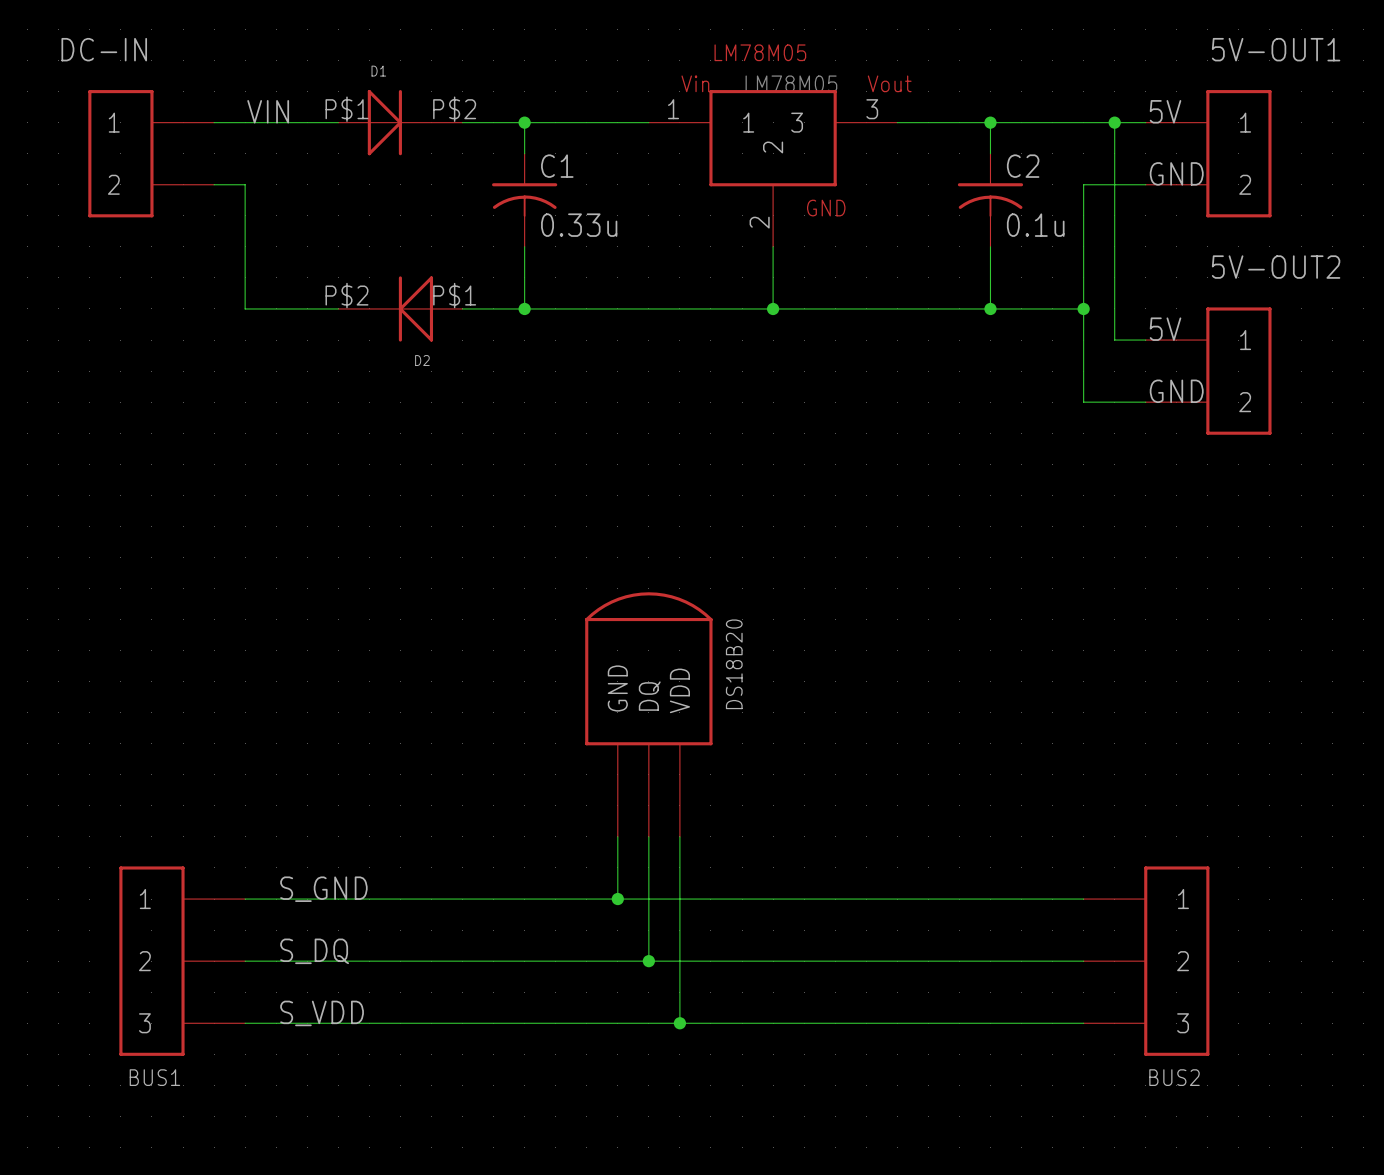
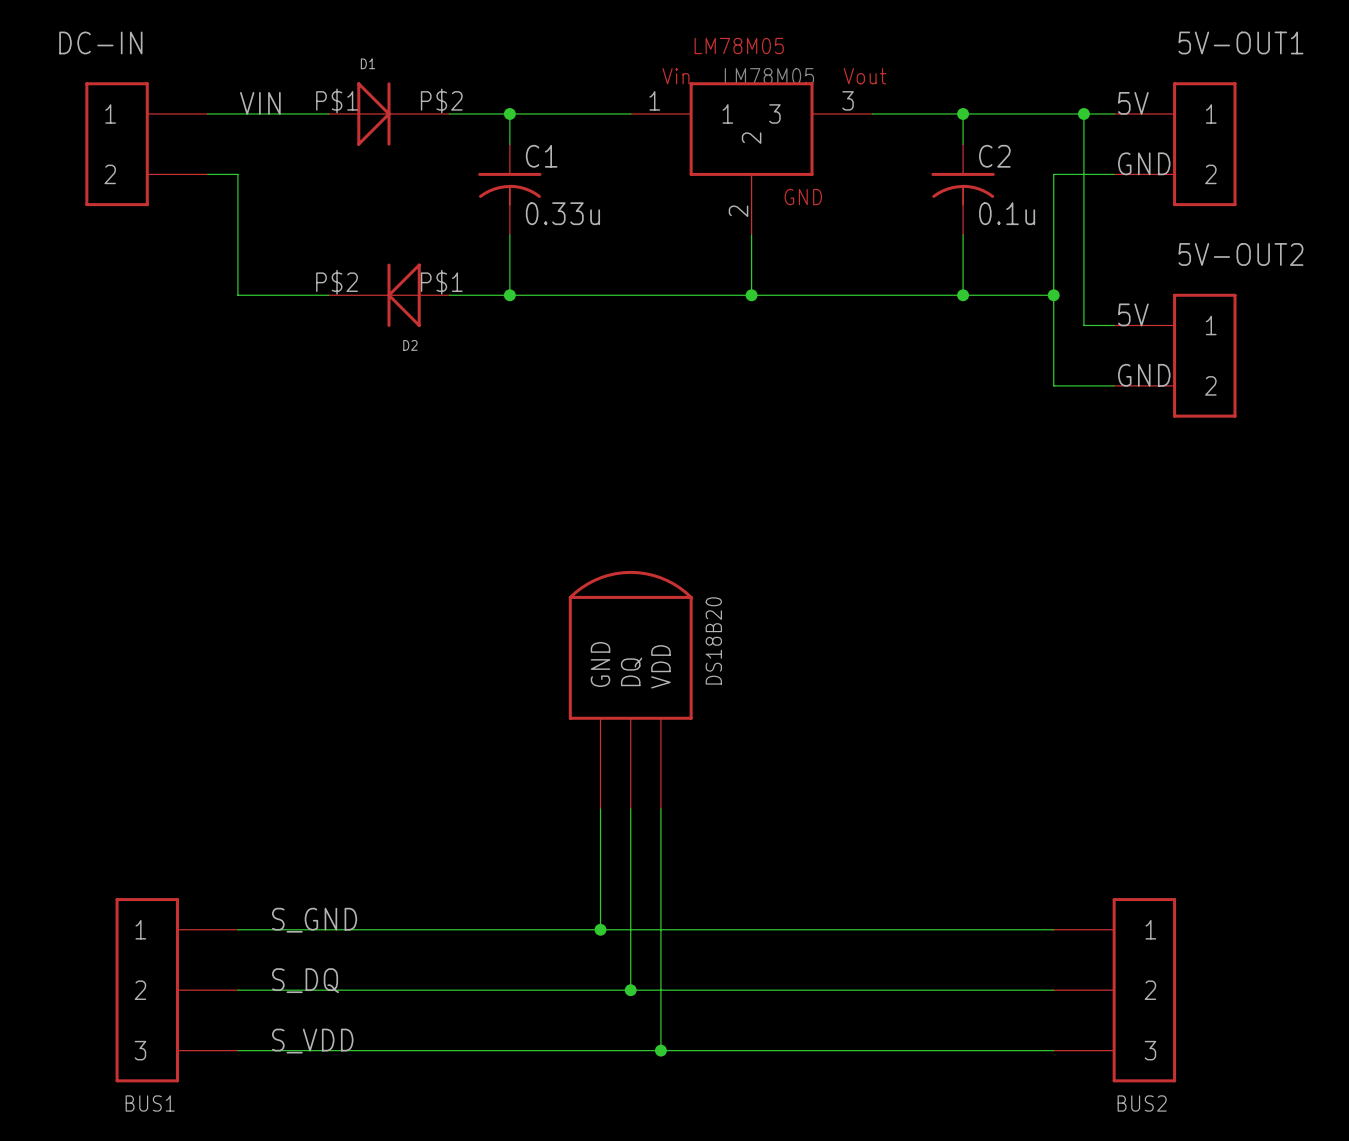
label: S_GND (323, 889) -> none
wire: (245, 899) (1083, 899) -> (237, 1050) (1053, 1050)
wire: none -> (600, 869) (600, 929)
junction: (617, 899) -> none
label: S_DQ (314, 951) -> S_GND (314, 920)
BUS1 position: (182, 961) -> (176, 990)
junction: none -> (600, 929)
wire: none -> (630, 929) (630, 990)
junction: (648, 961) -> none
BUS2 position: (1146, 961) -> (1114, 990)
label: S_VDD (322, 1013) -> S_DQ (305, 980)
junction: none -> (630, 990)
wire: none -> (660, 990) (660, 1050)
junction: (679, 1023) -> none
label: none -> S_VDD (312, 1041)
junction: none -> (660, 1050)

